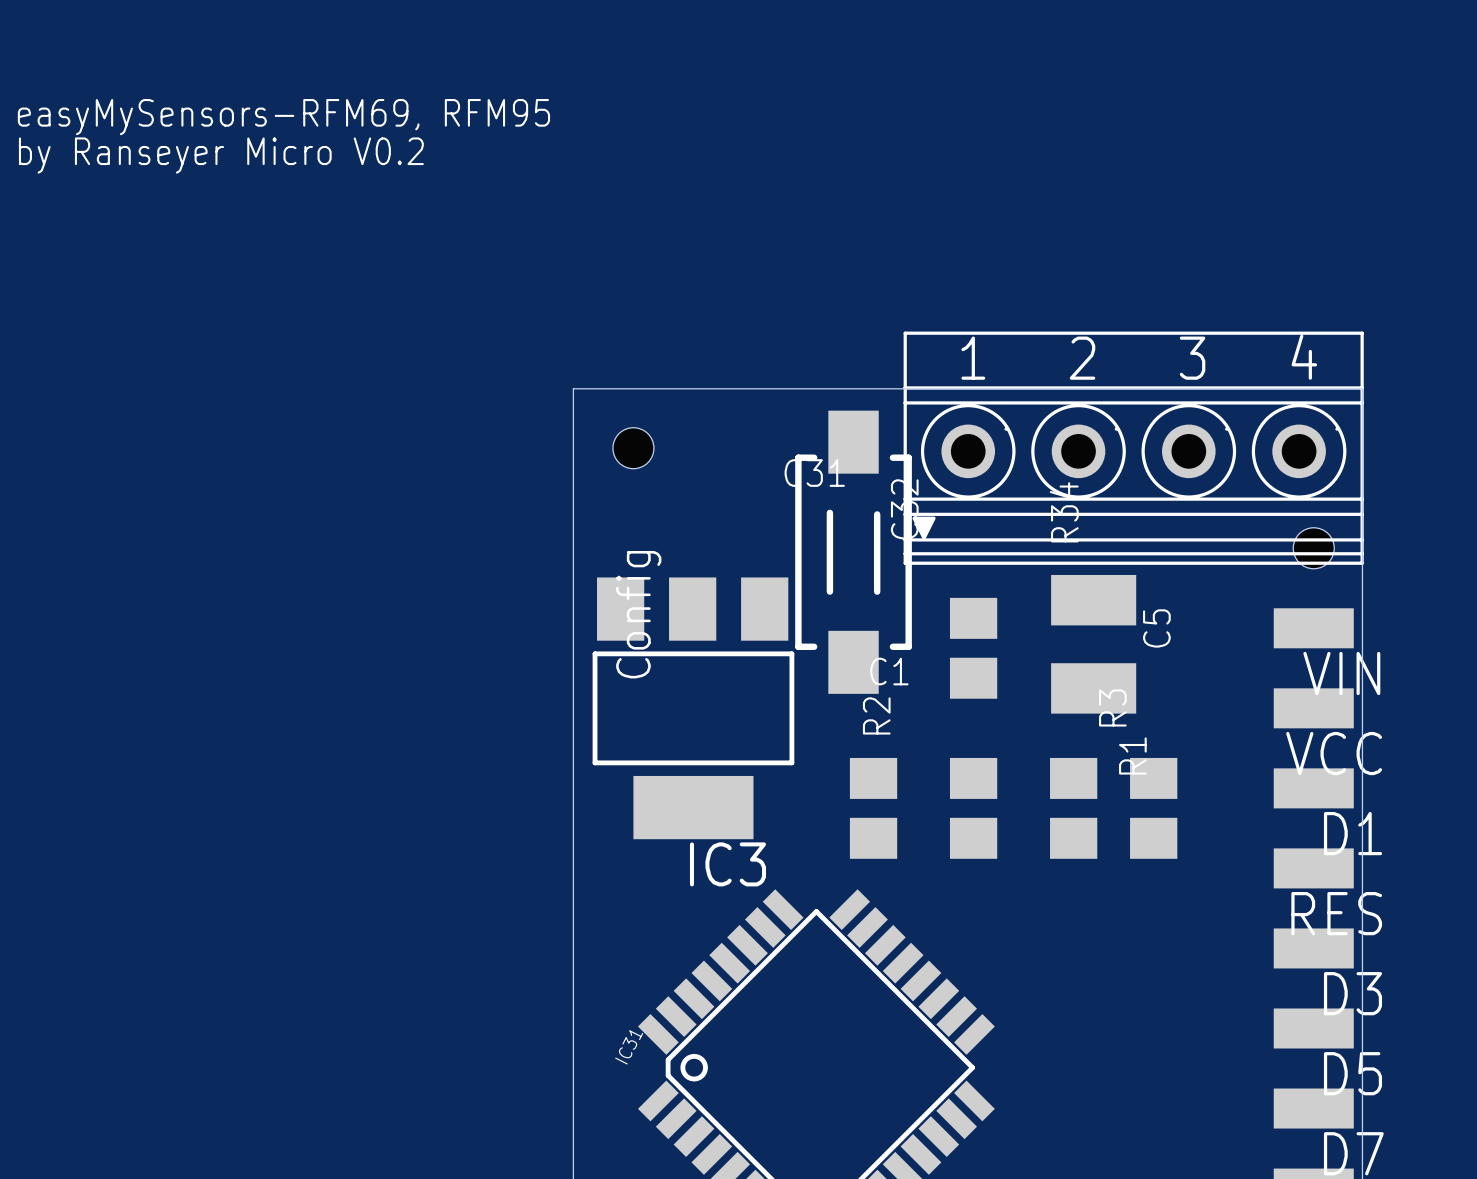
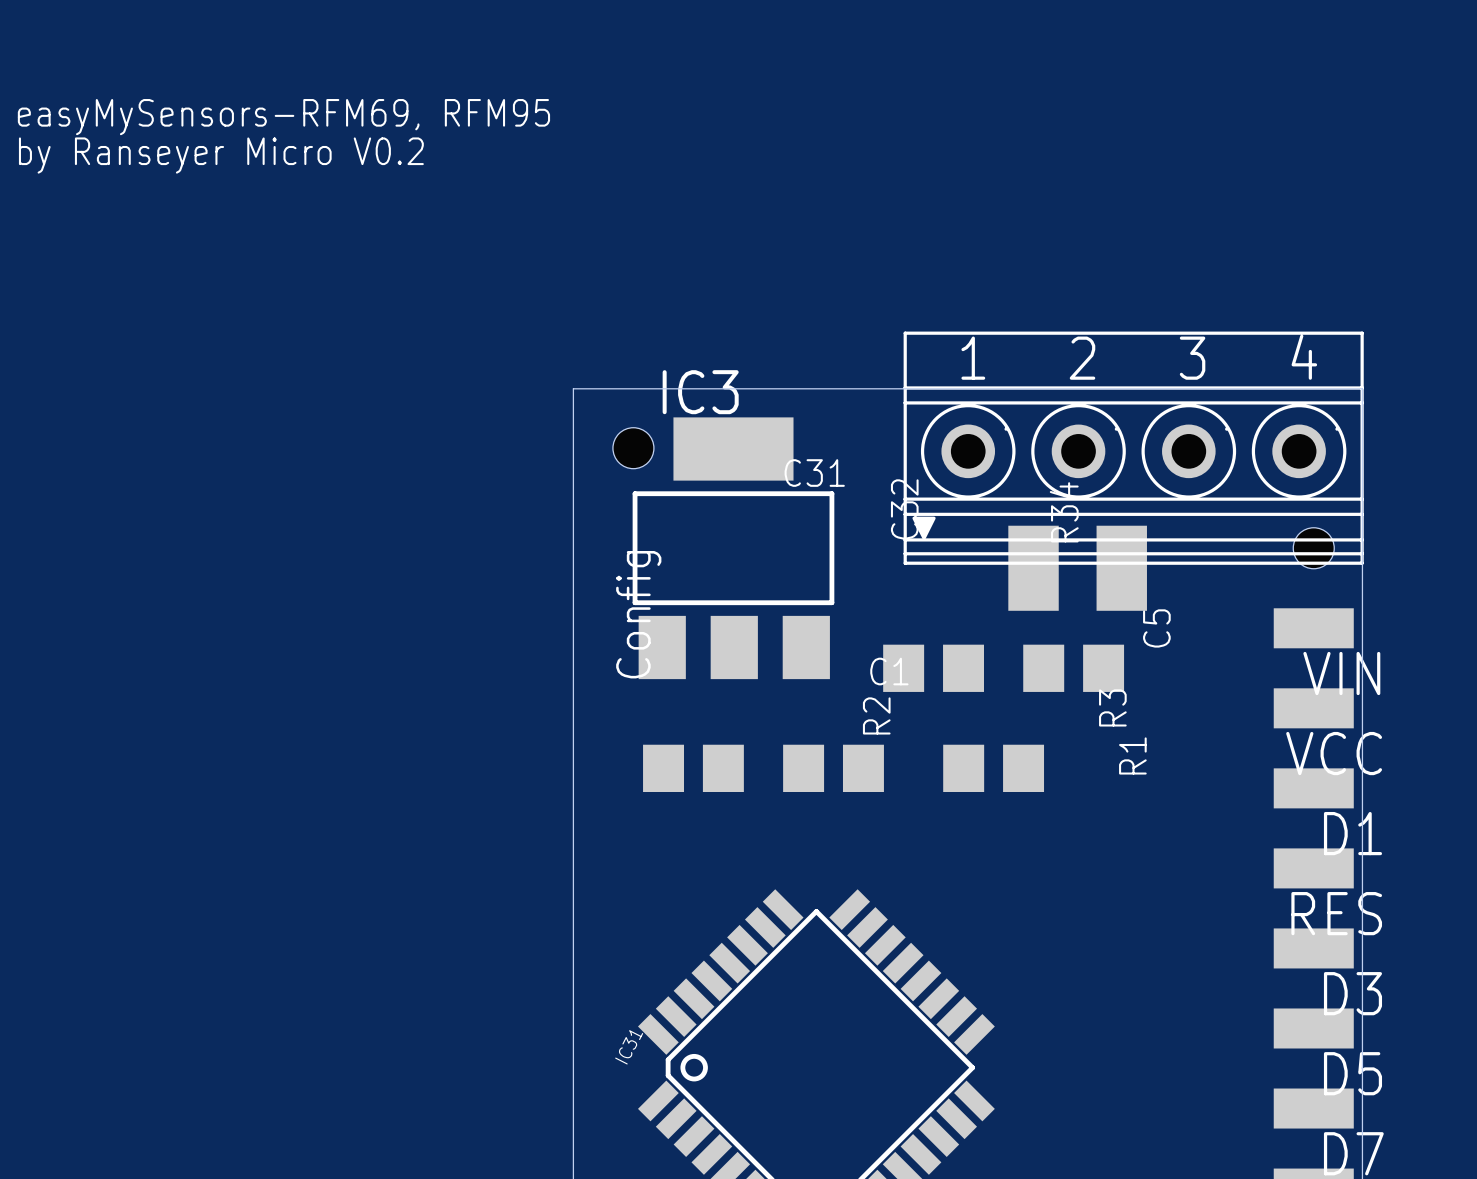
part: (853, 552) -> none
part: none -> (1077, 568)
part footprint: [1051, 574, 1137, 714] -> [1023, 644, 1125, 692]
part rotation: 0° (973, 648) -> 90° clockwise (933, 668)
IC3 rotation: 0° (693, 708) -> 180° (733, 548)
IC3 position: (693, 708) -> (733, 548)
part: none -> (693, 768)
part: none -> (993, 768)
part rotation: 0° (873, 808) -> 90° clockwise (833, 768)
part: (973, 808) -> none
part: (1073, 808) -> none
part: (1153, 808) -> none

